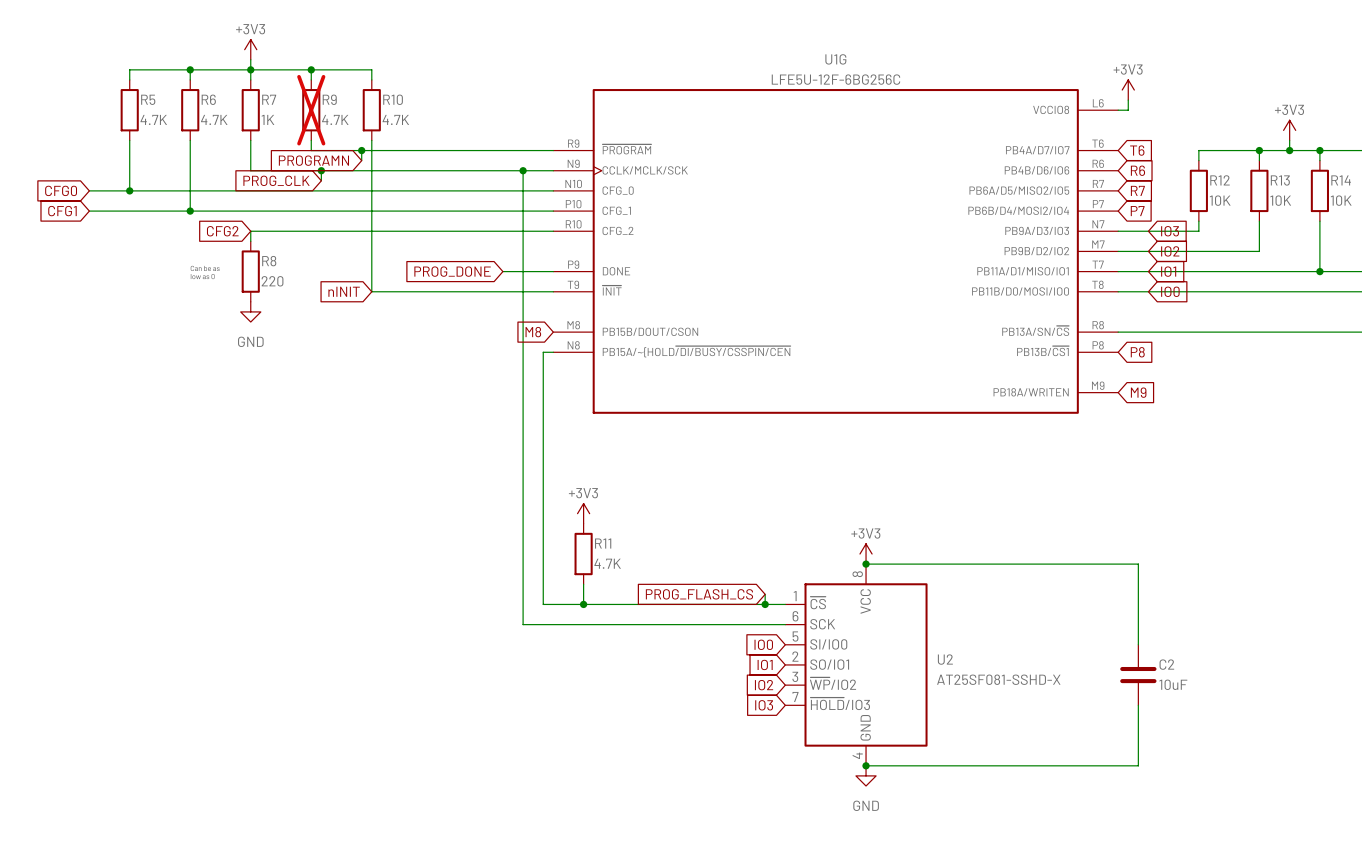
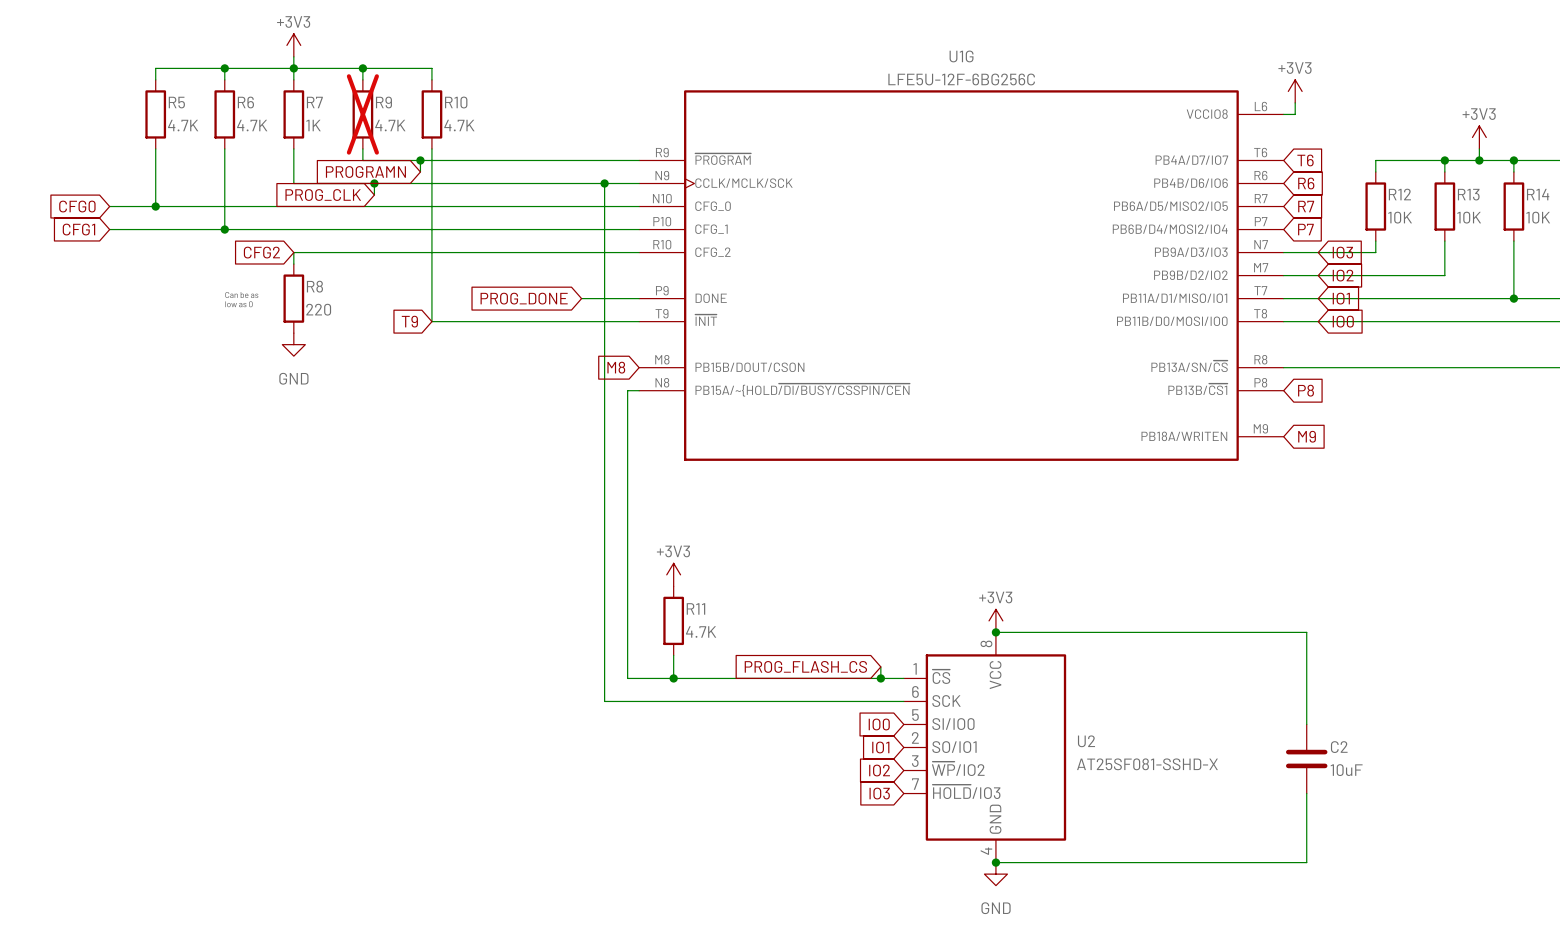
global label: nINIT (344, 291) -> T9 (409, 321)

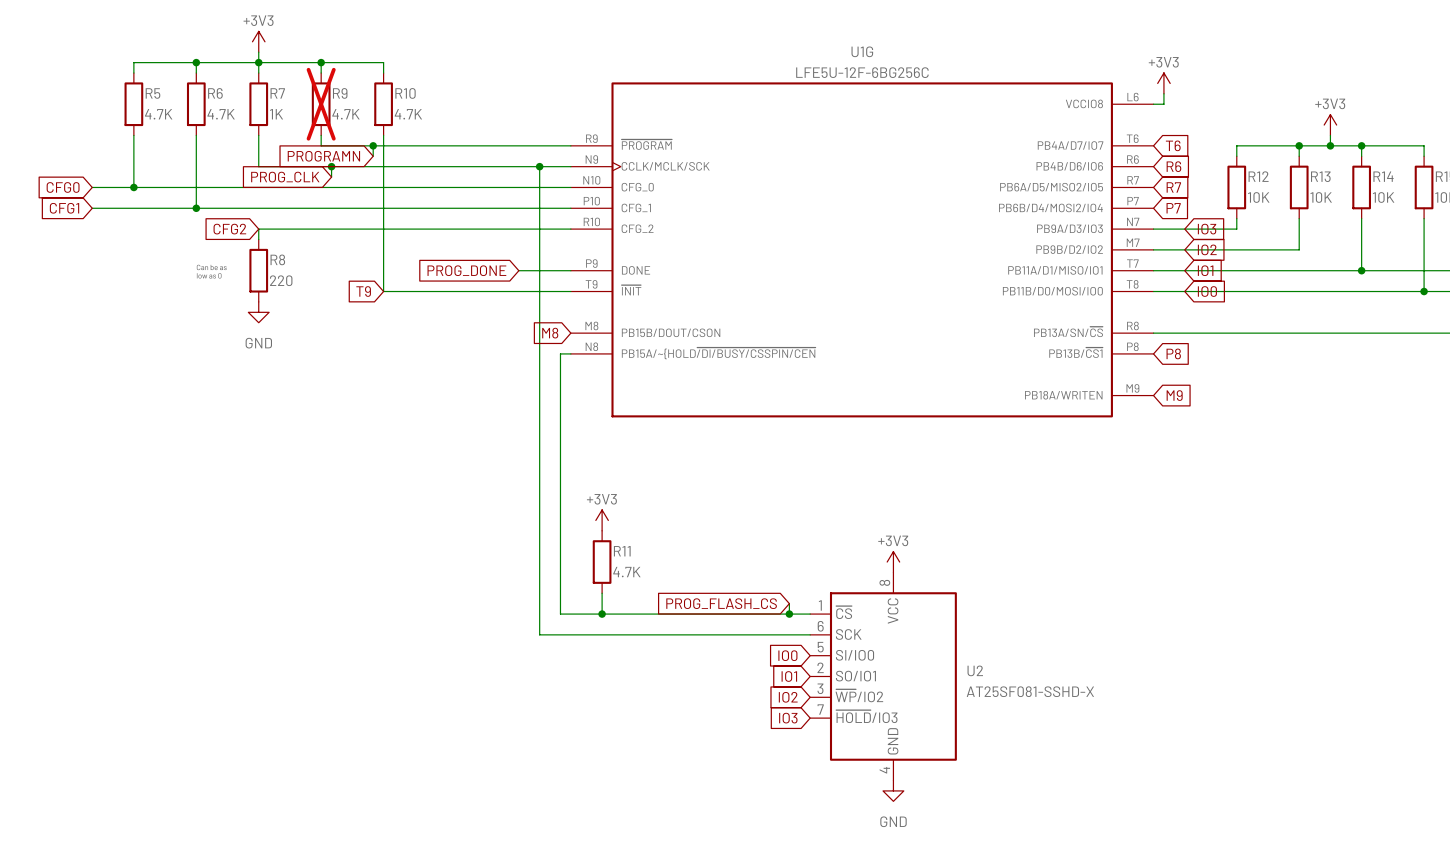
wire: (995, 632) (1306, 632) (1306, 724) -> none
junction: (995, 632) -> none
C2: 10uF (1306, 759) -> none
wire: (1306, 793) (1306, 862) (995, 862) -> none
junction: (995, 862) -> none

